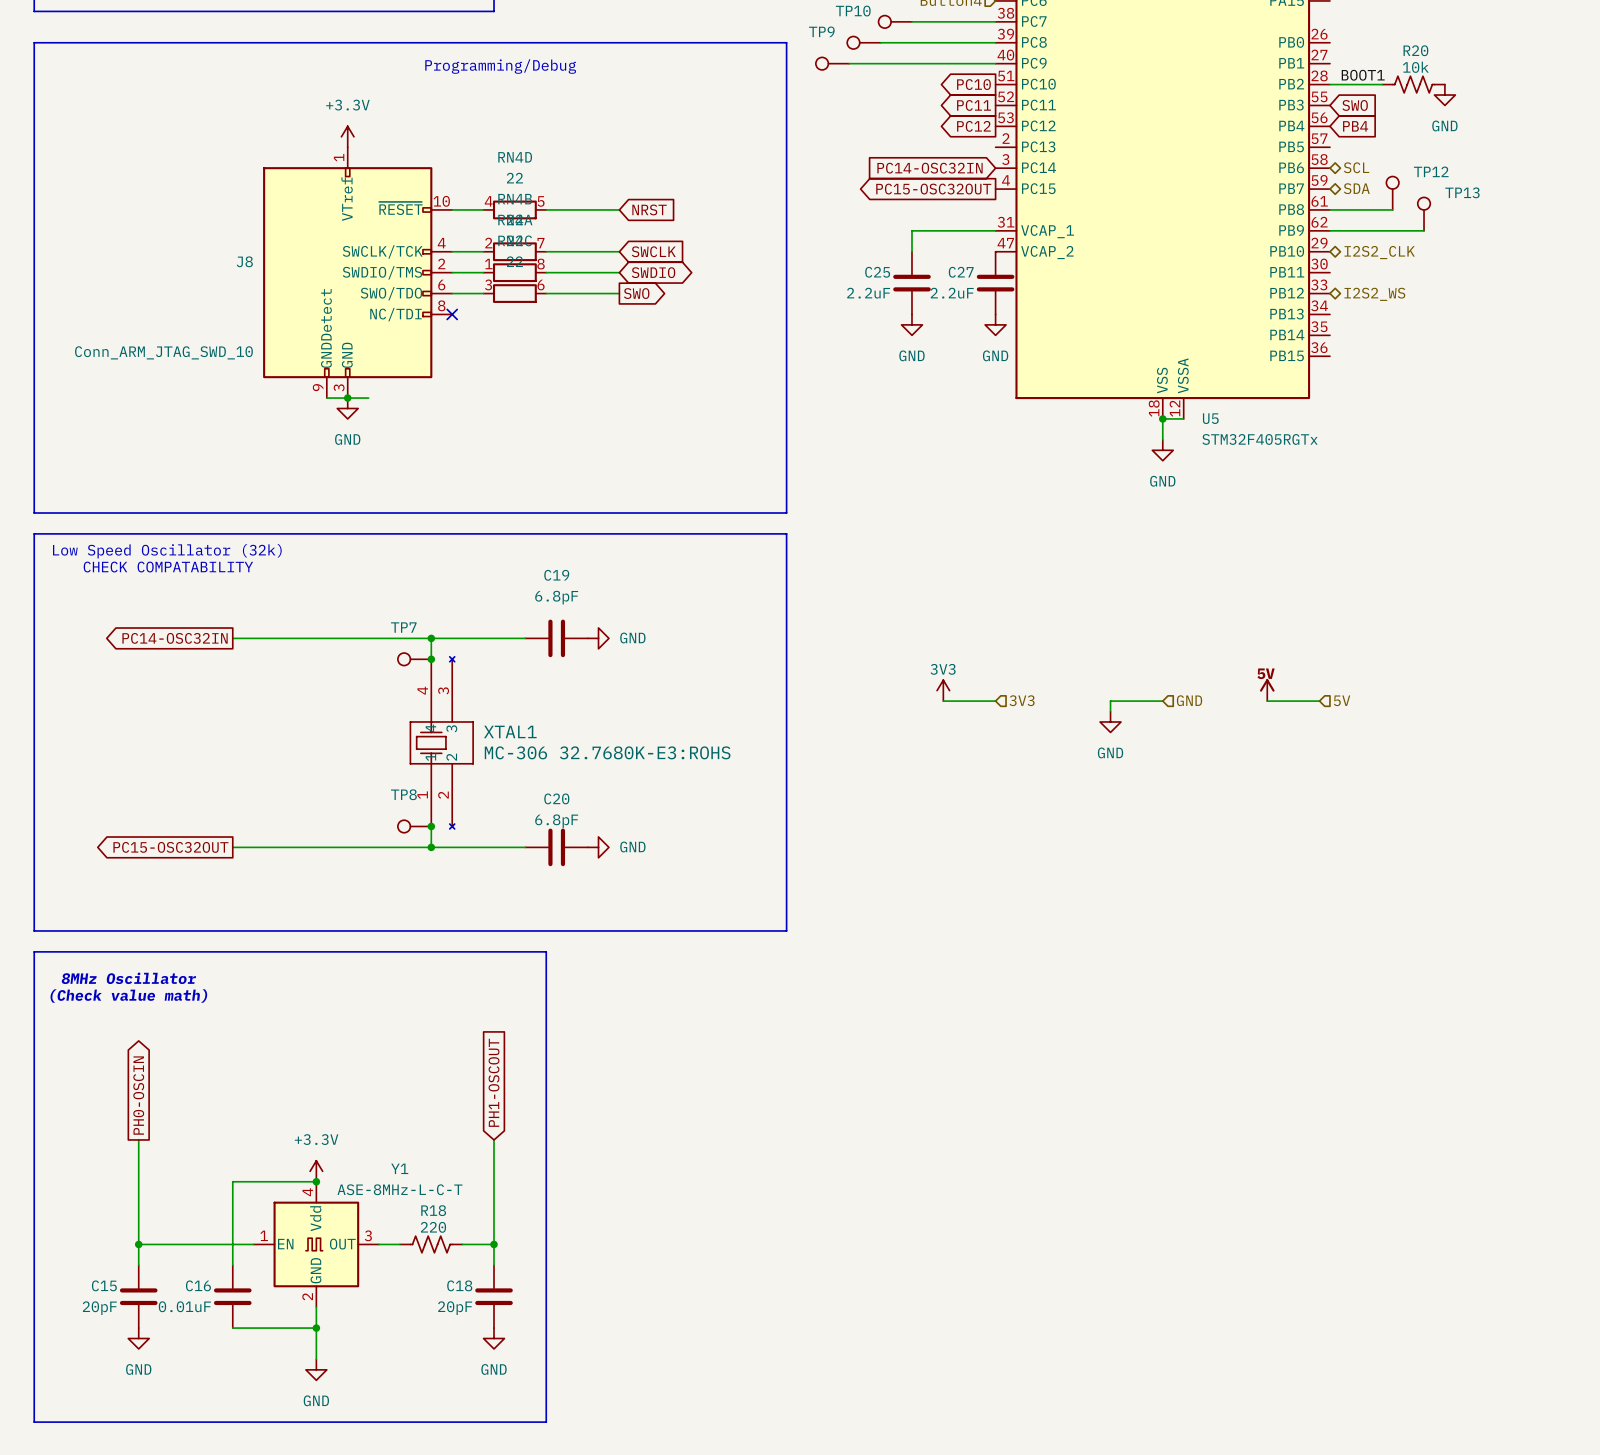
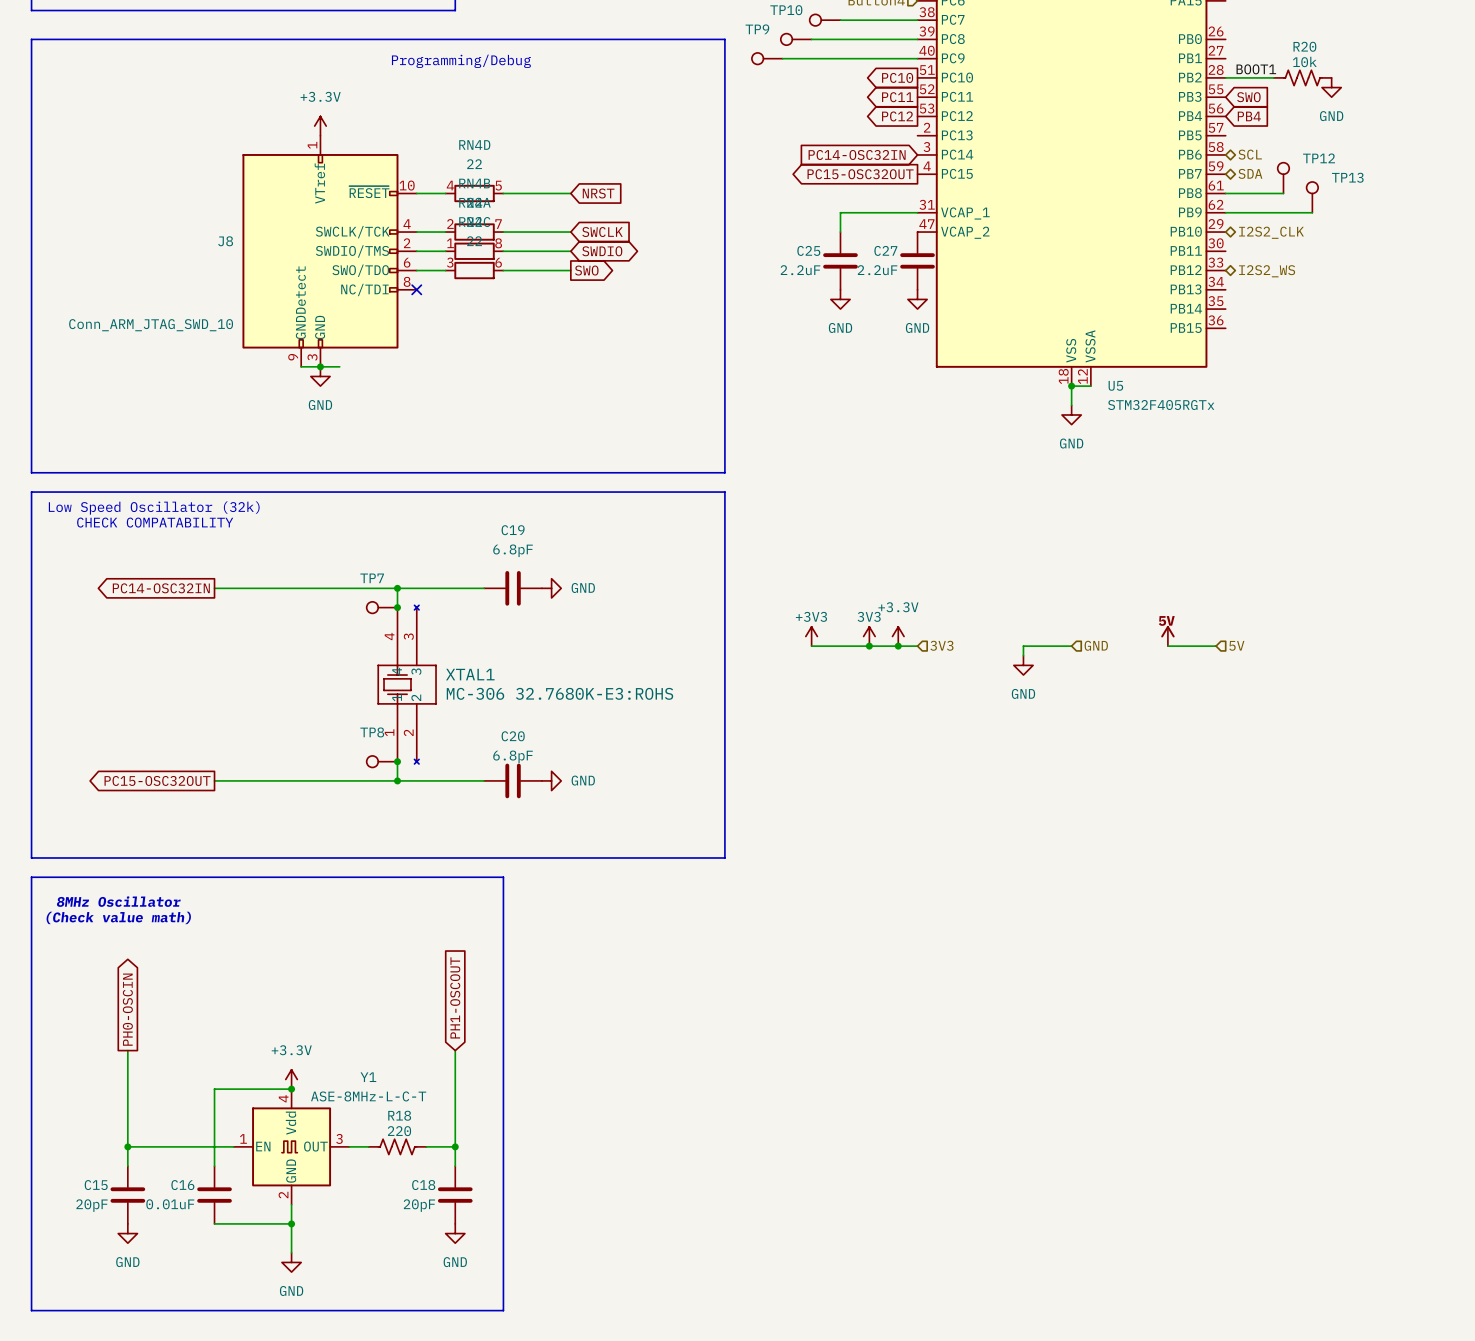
power symbol: none -> +3V3 (811, 636)
power symbol: none -> +3.3V (898, 636)
wire: none -> (811, 646) (869, 646)
junction: none -> (869, 646)
junction: none -> (898, 646)

